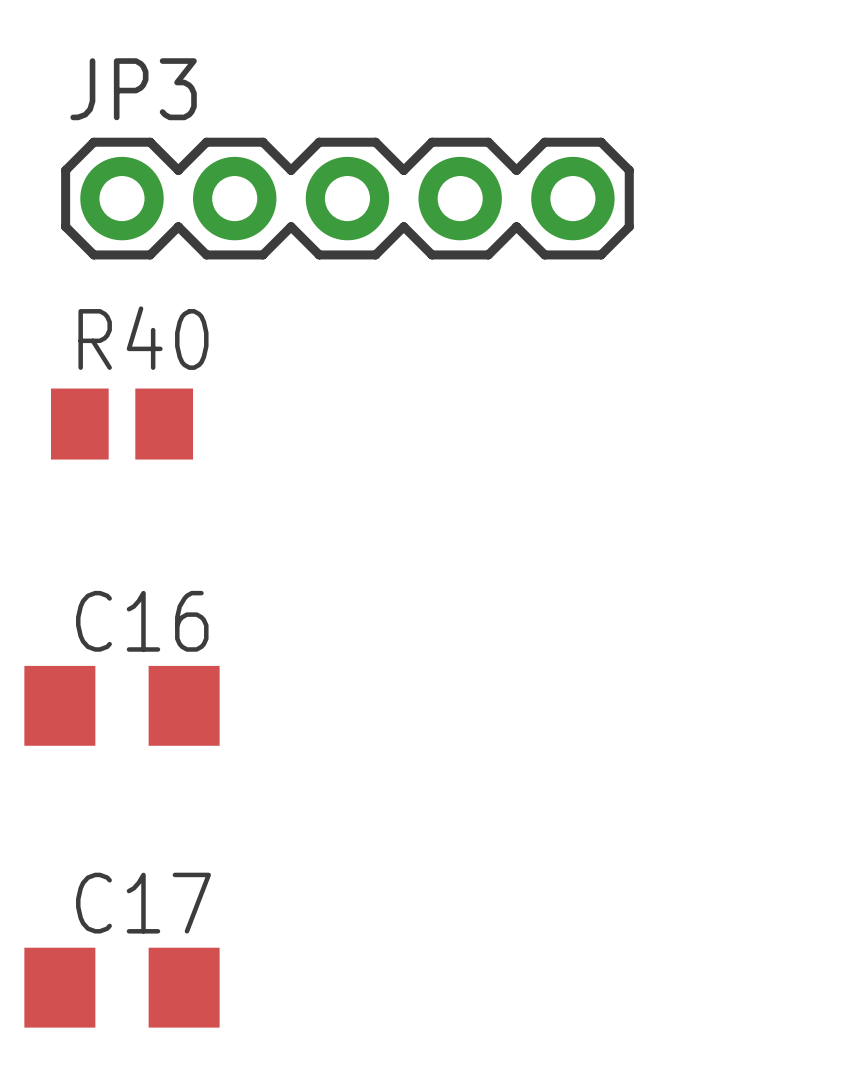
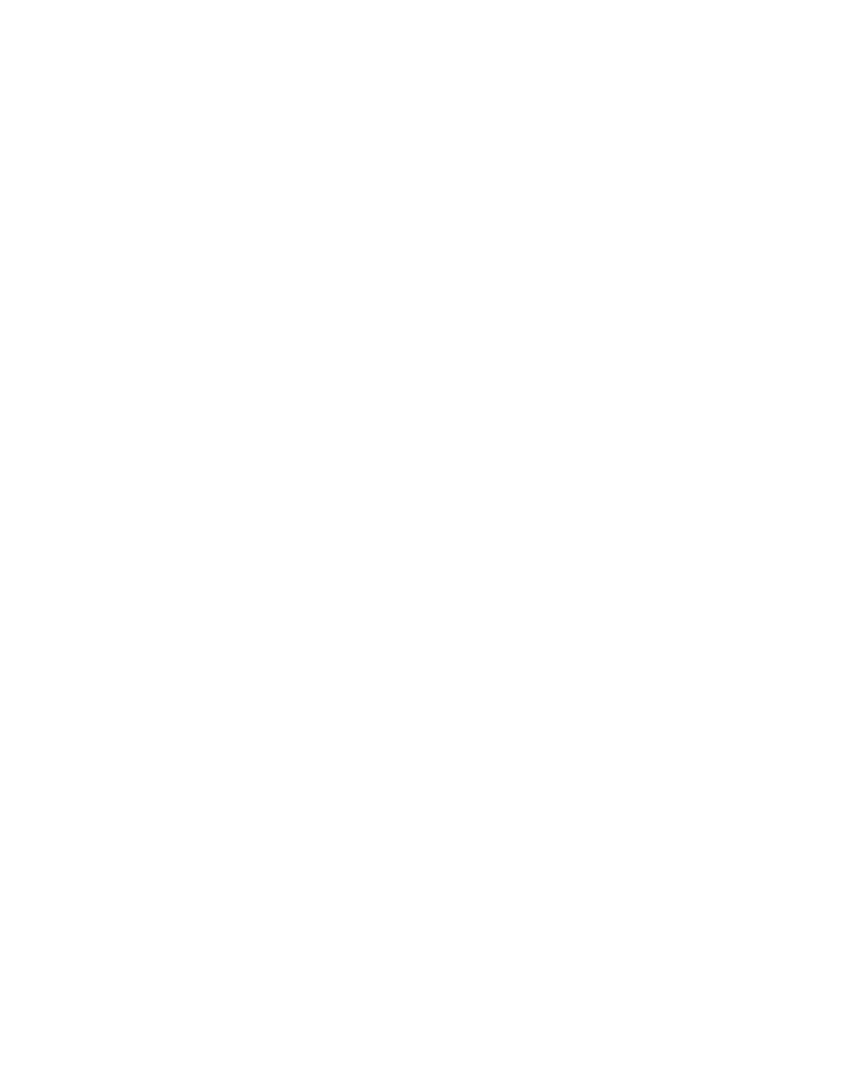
JP3: (347, 198) -> none
R40: (121, 424) -> none
C16: (121, 705) -> none
C17: (121, 987) -> none

